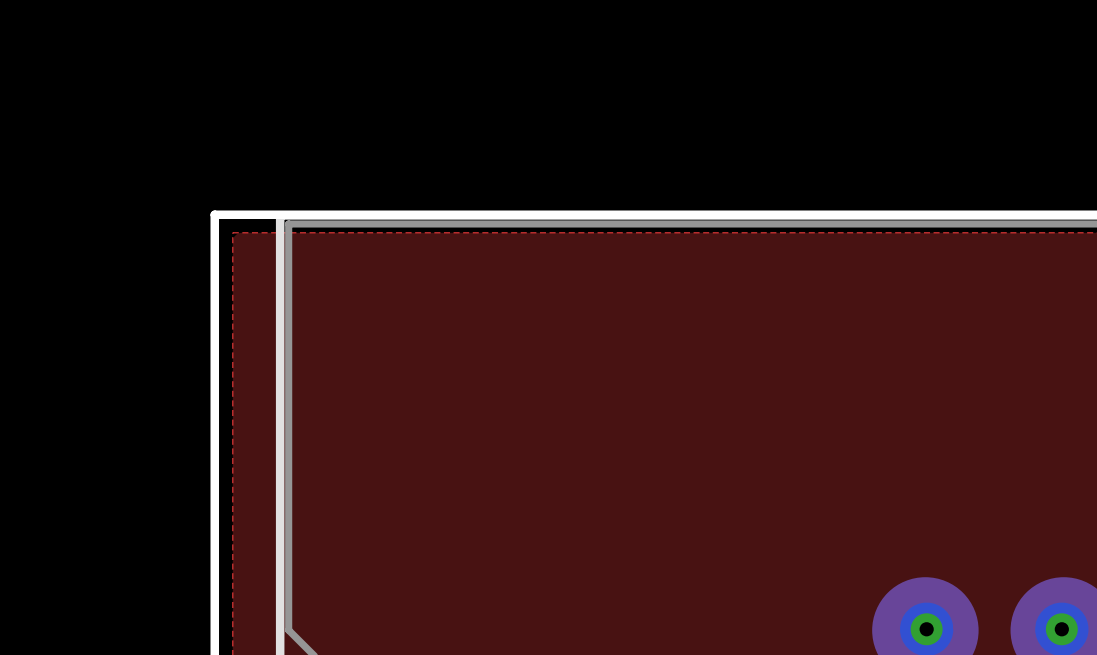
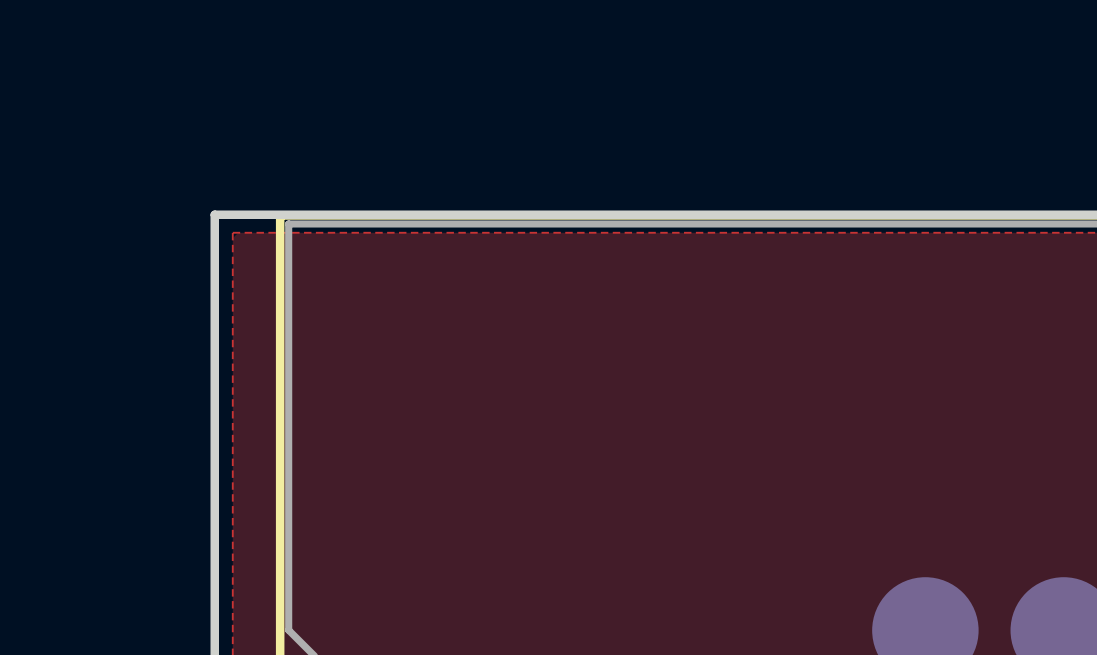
via: (926, 629) -> none
via: (1061, 629) -> none

